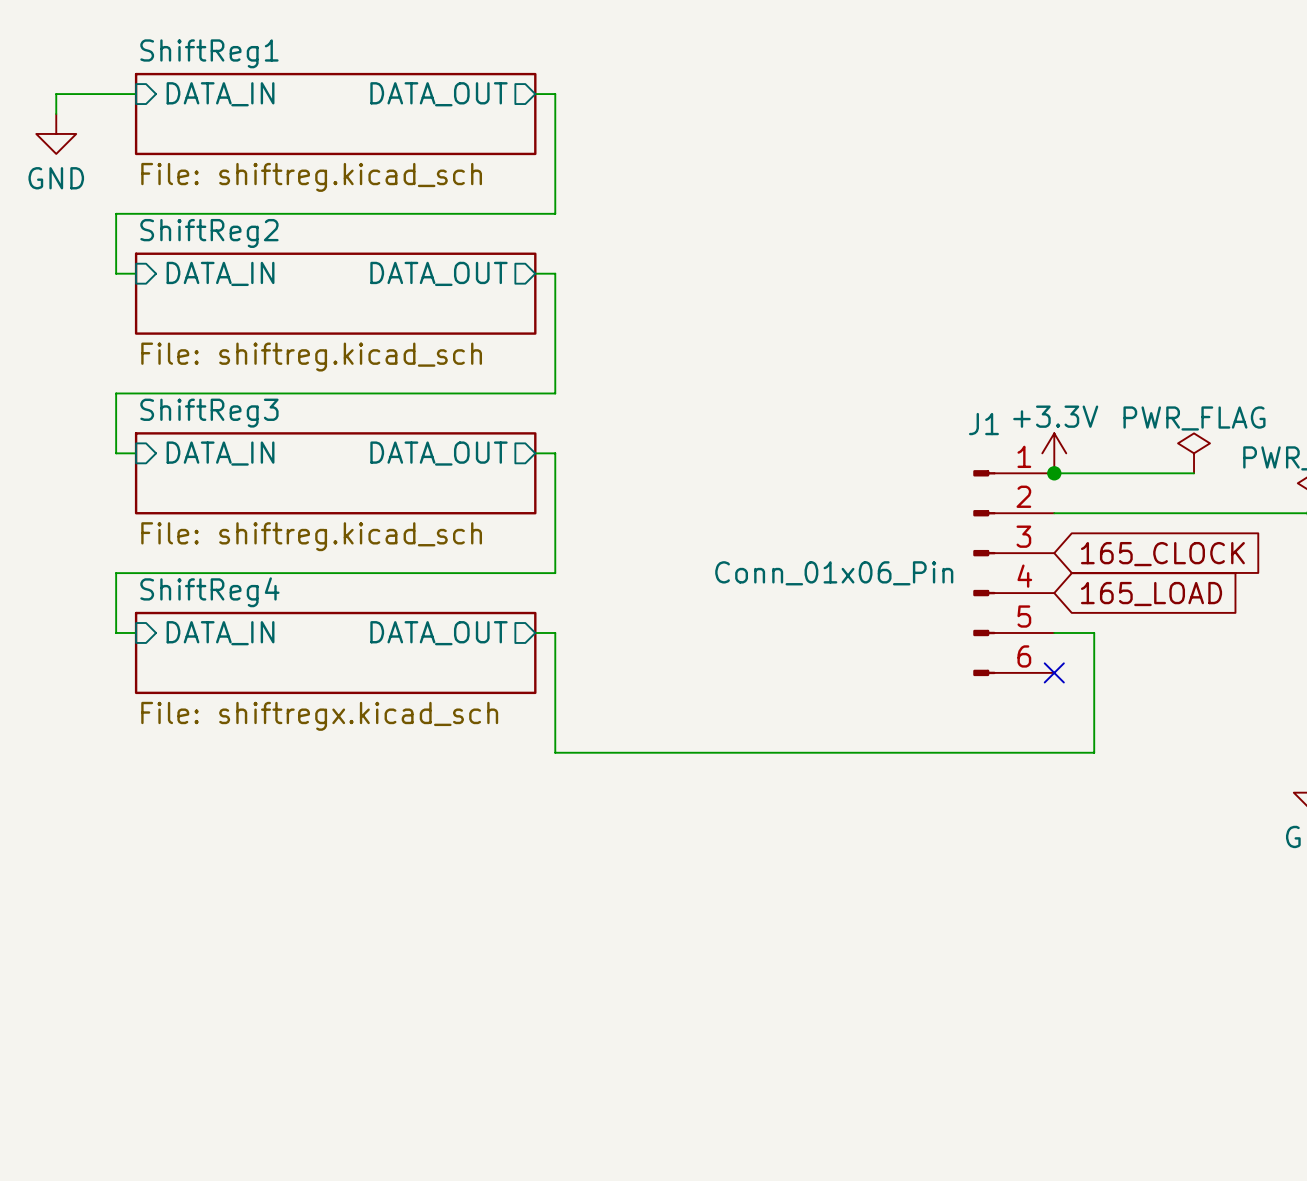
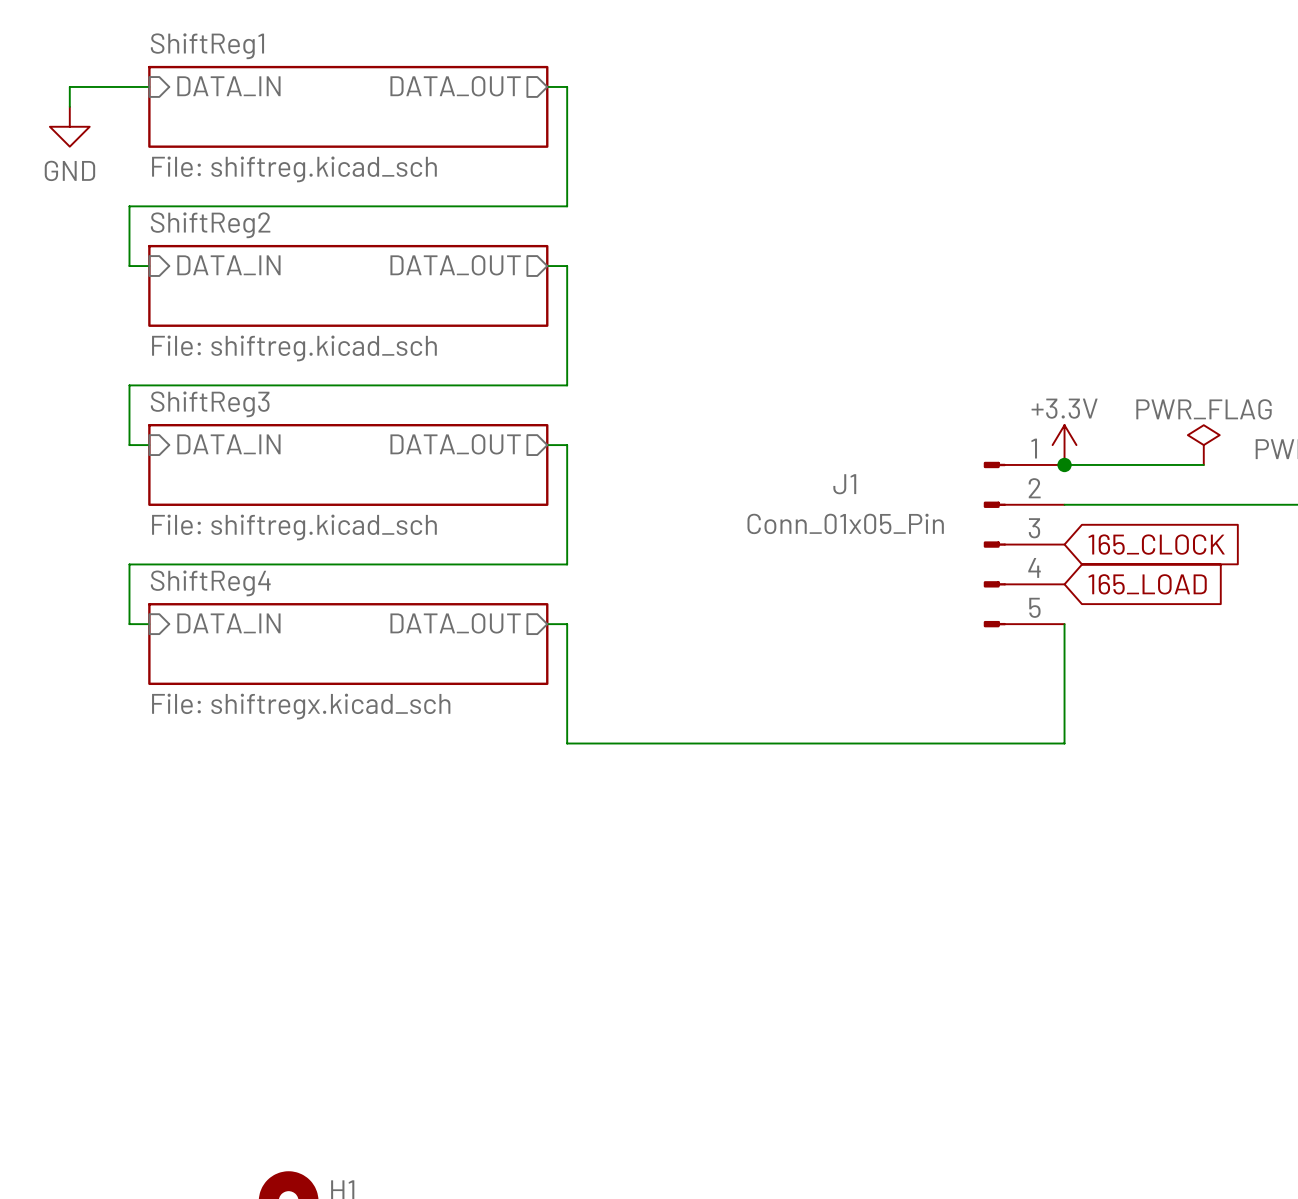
J1 name position: J1 (983, 424) -> J1 (844, 484)
J1 symbol: [973, 470, 1055, 677] -> [983, 461, 1065, 628]
J1 value: Conn_01x06_Pin (834, 573) -> Conn_01x05_Pin (845, 523)
wire: (1054, 632) (1094, 632) (1094, 752) (1054, 752) -> (1064, 624) (1064, 743)
no-connect mark: (1054, 672) -> none

